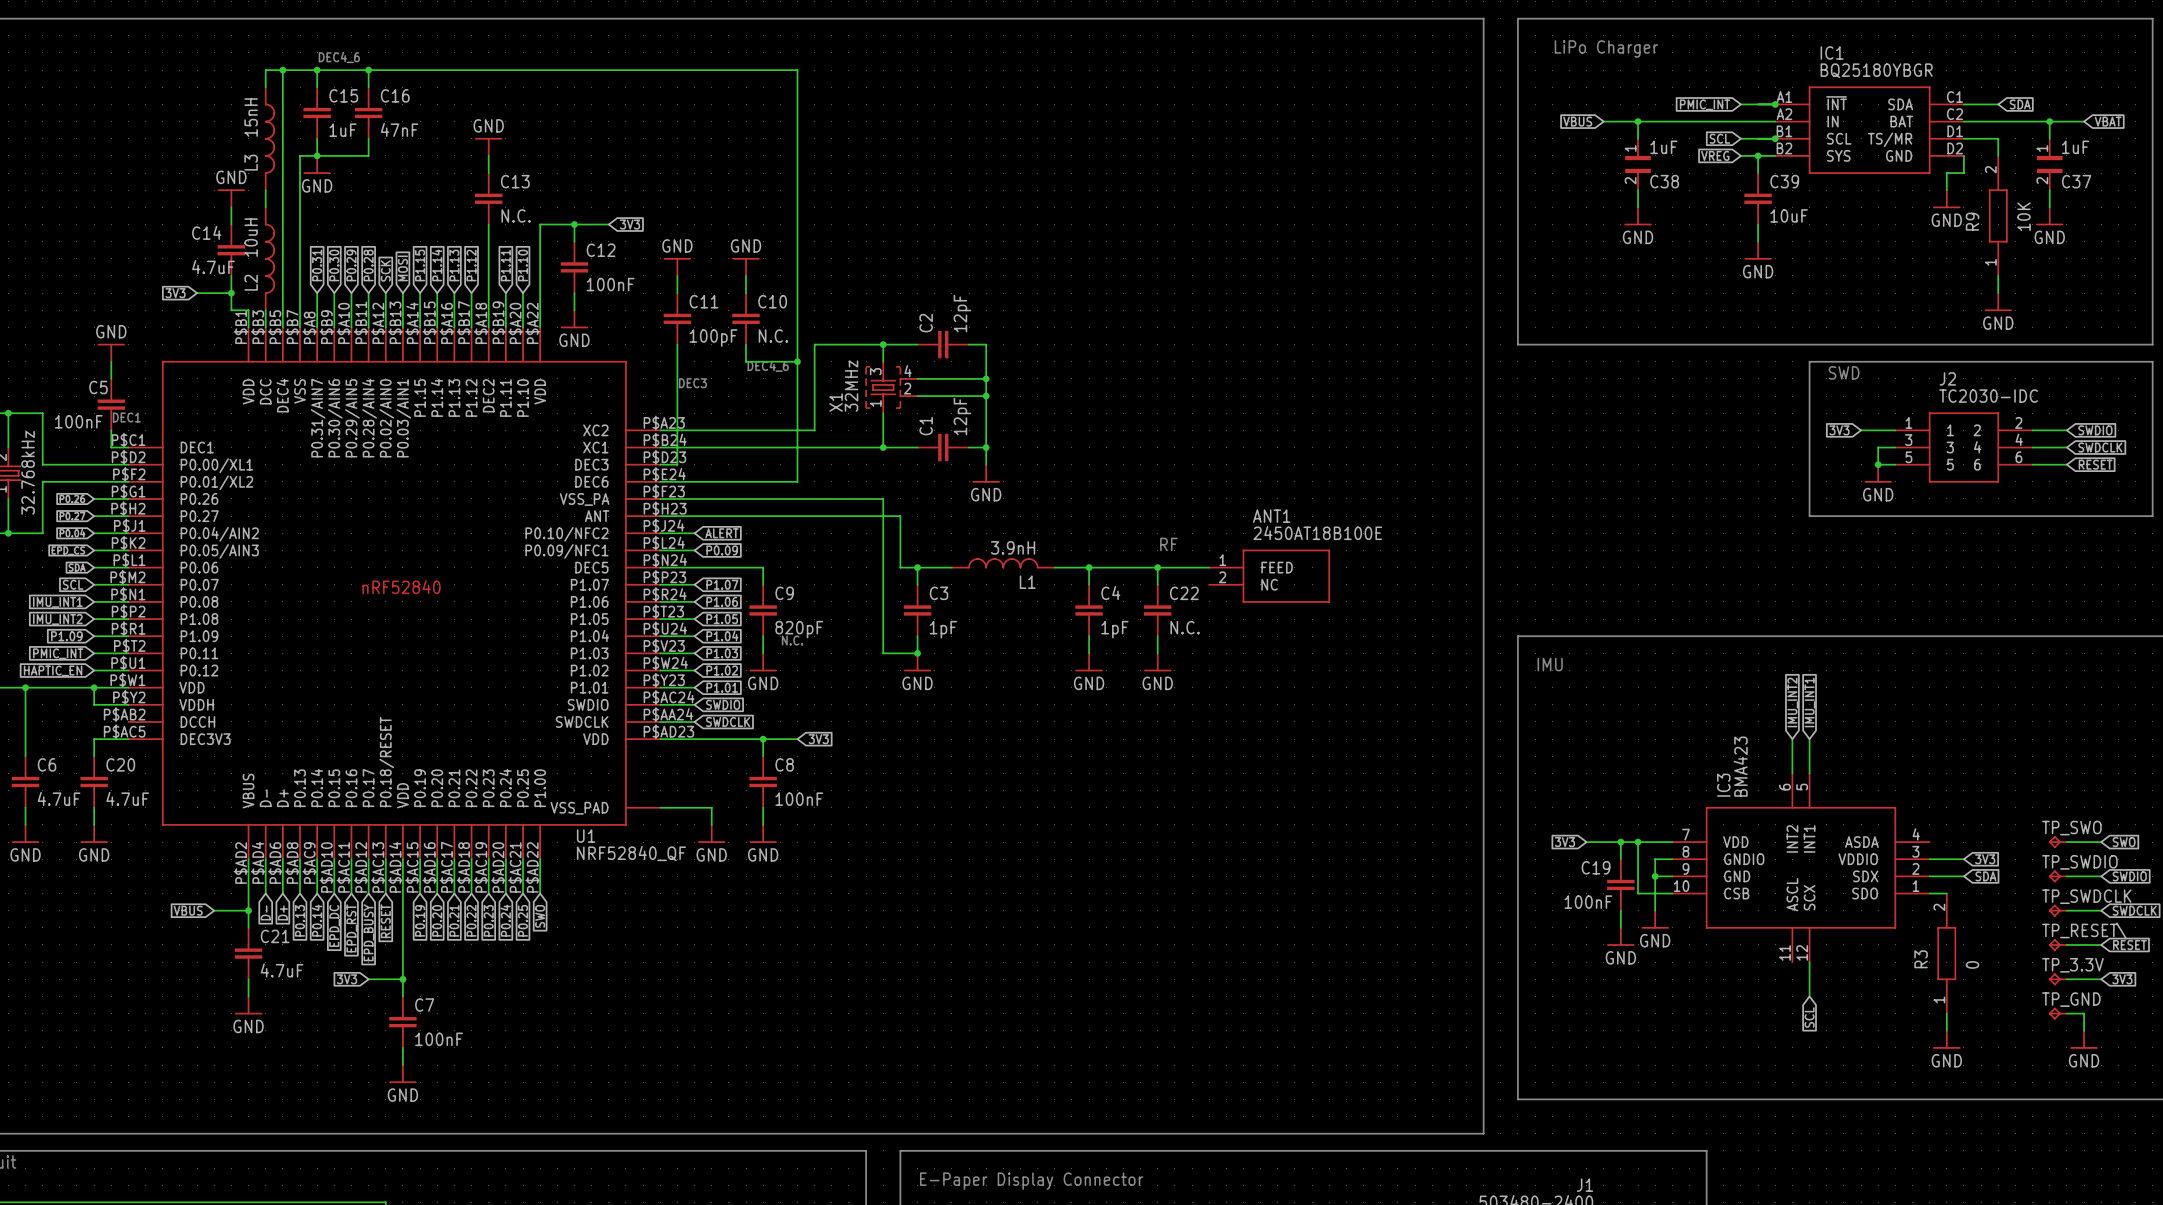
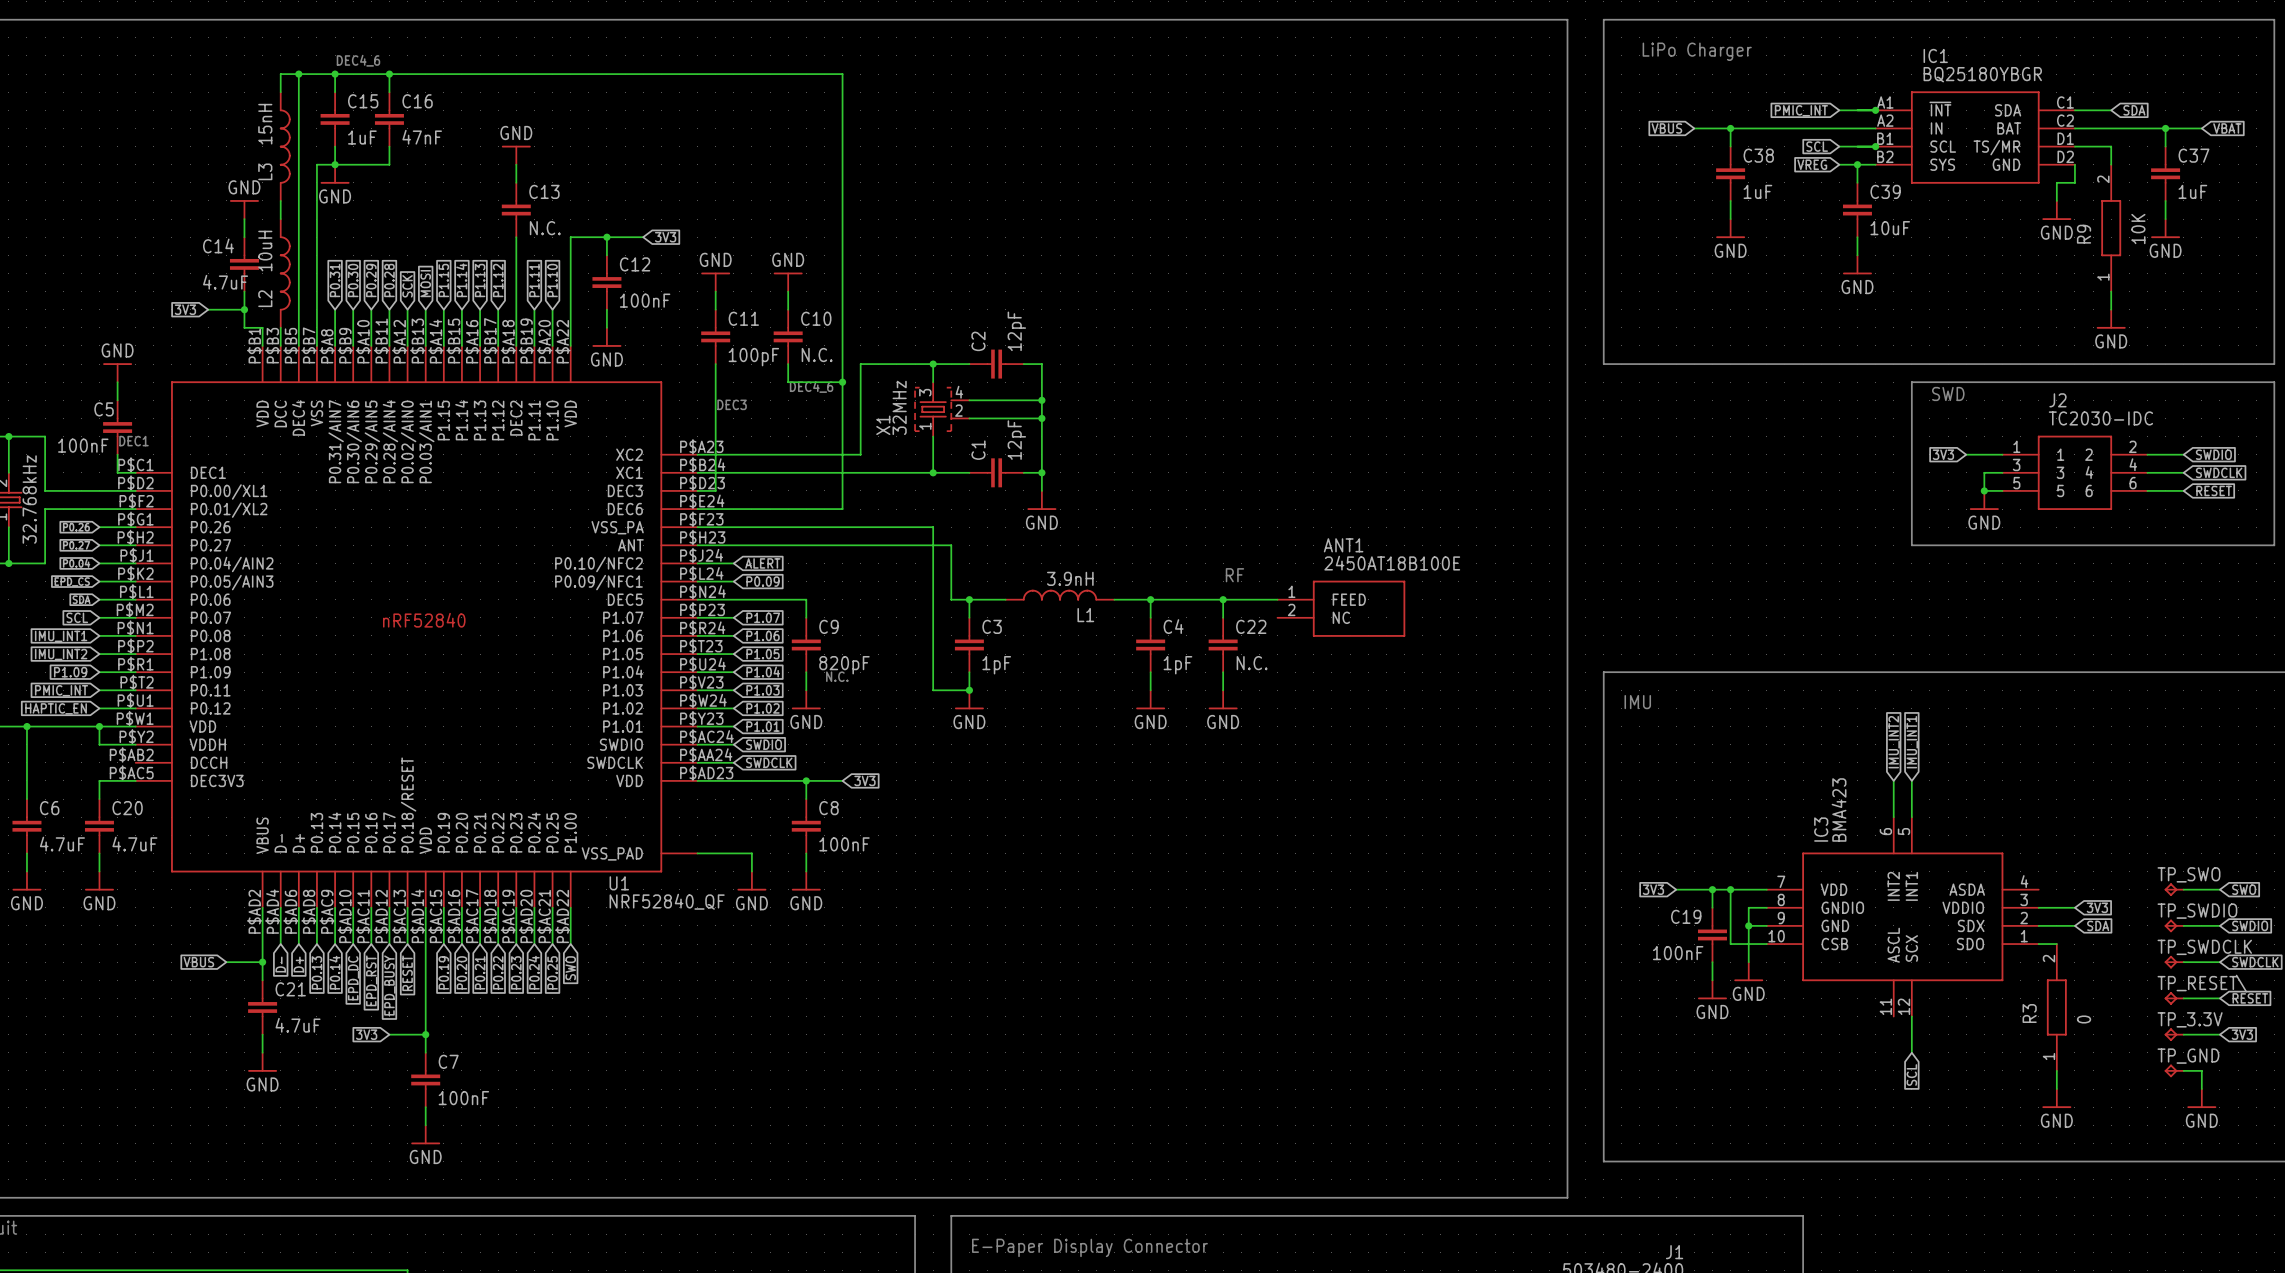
C38 symbol: [1625, 138, 1651, 191] -> [1716, 146, 1746, 201]
C37 symbol: [2036, 138, 2063, 191] -> [2151, 146, 2181, 201]
C38 value position: 1uF (1663, 147) -> 1uF (1757, 191)
C37 value position: 1uF (2075, 147) -> 1uF (2192, 191)
C38 name position: C38 (1664, 181) -> C38 (1758, 155)
C37 name position: C37 (2076, 181) -> C37 (2193, 155)

